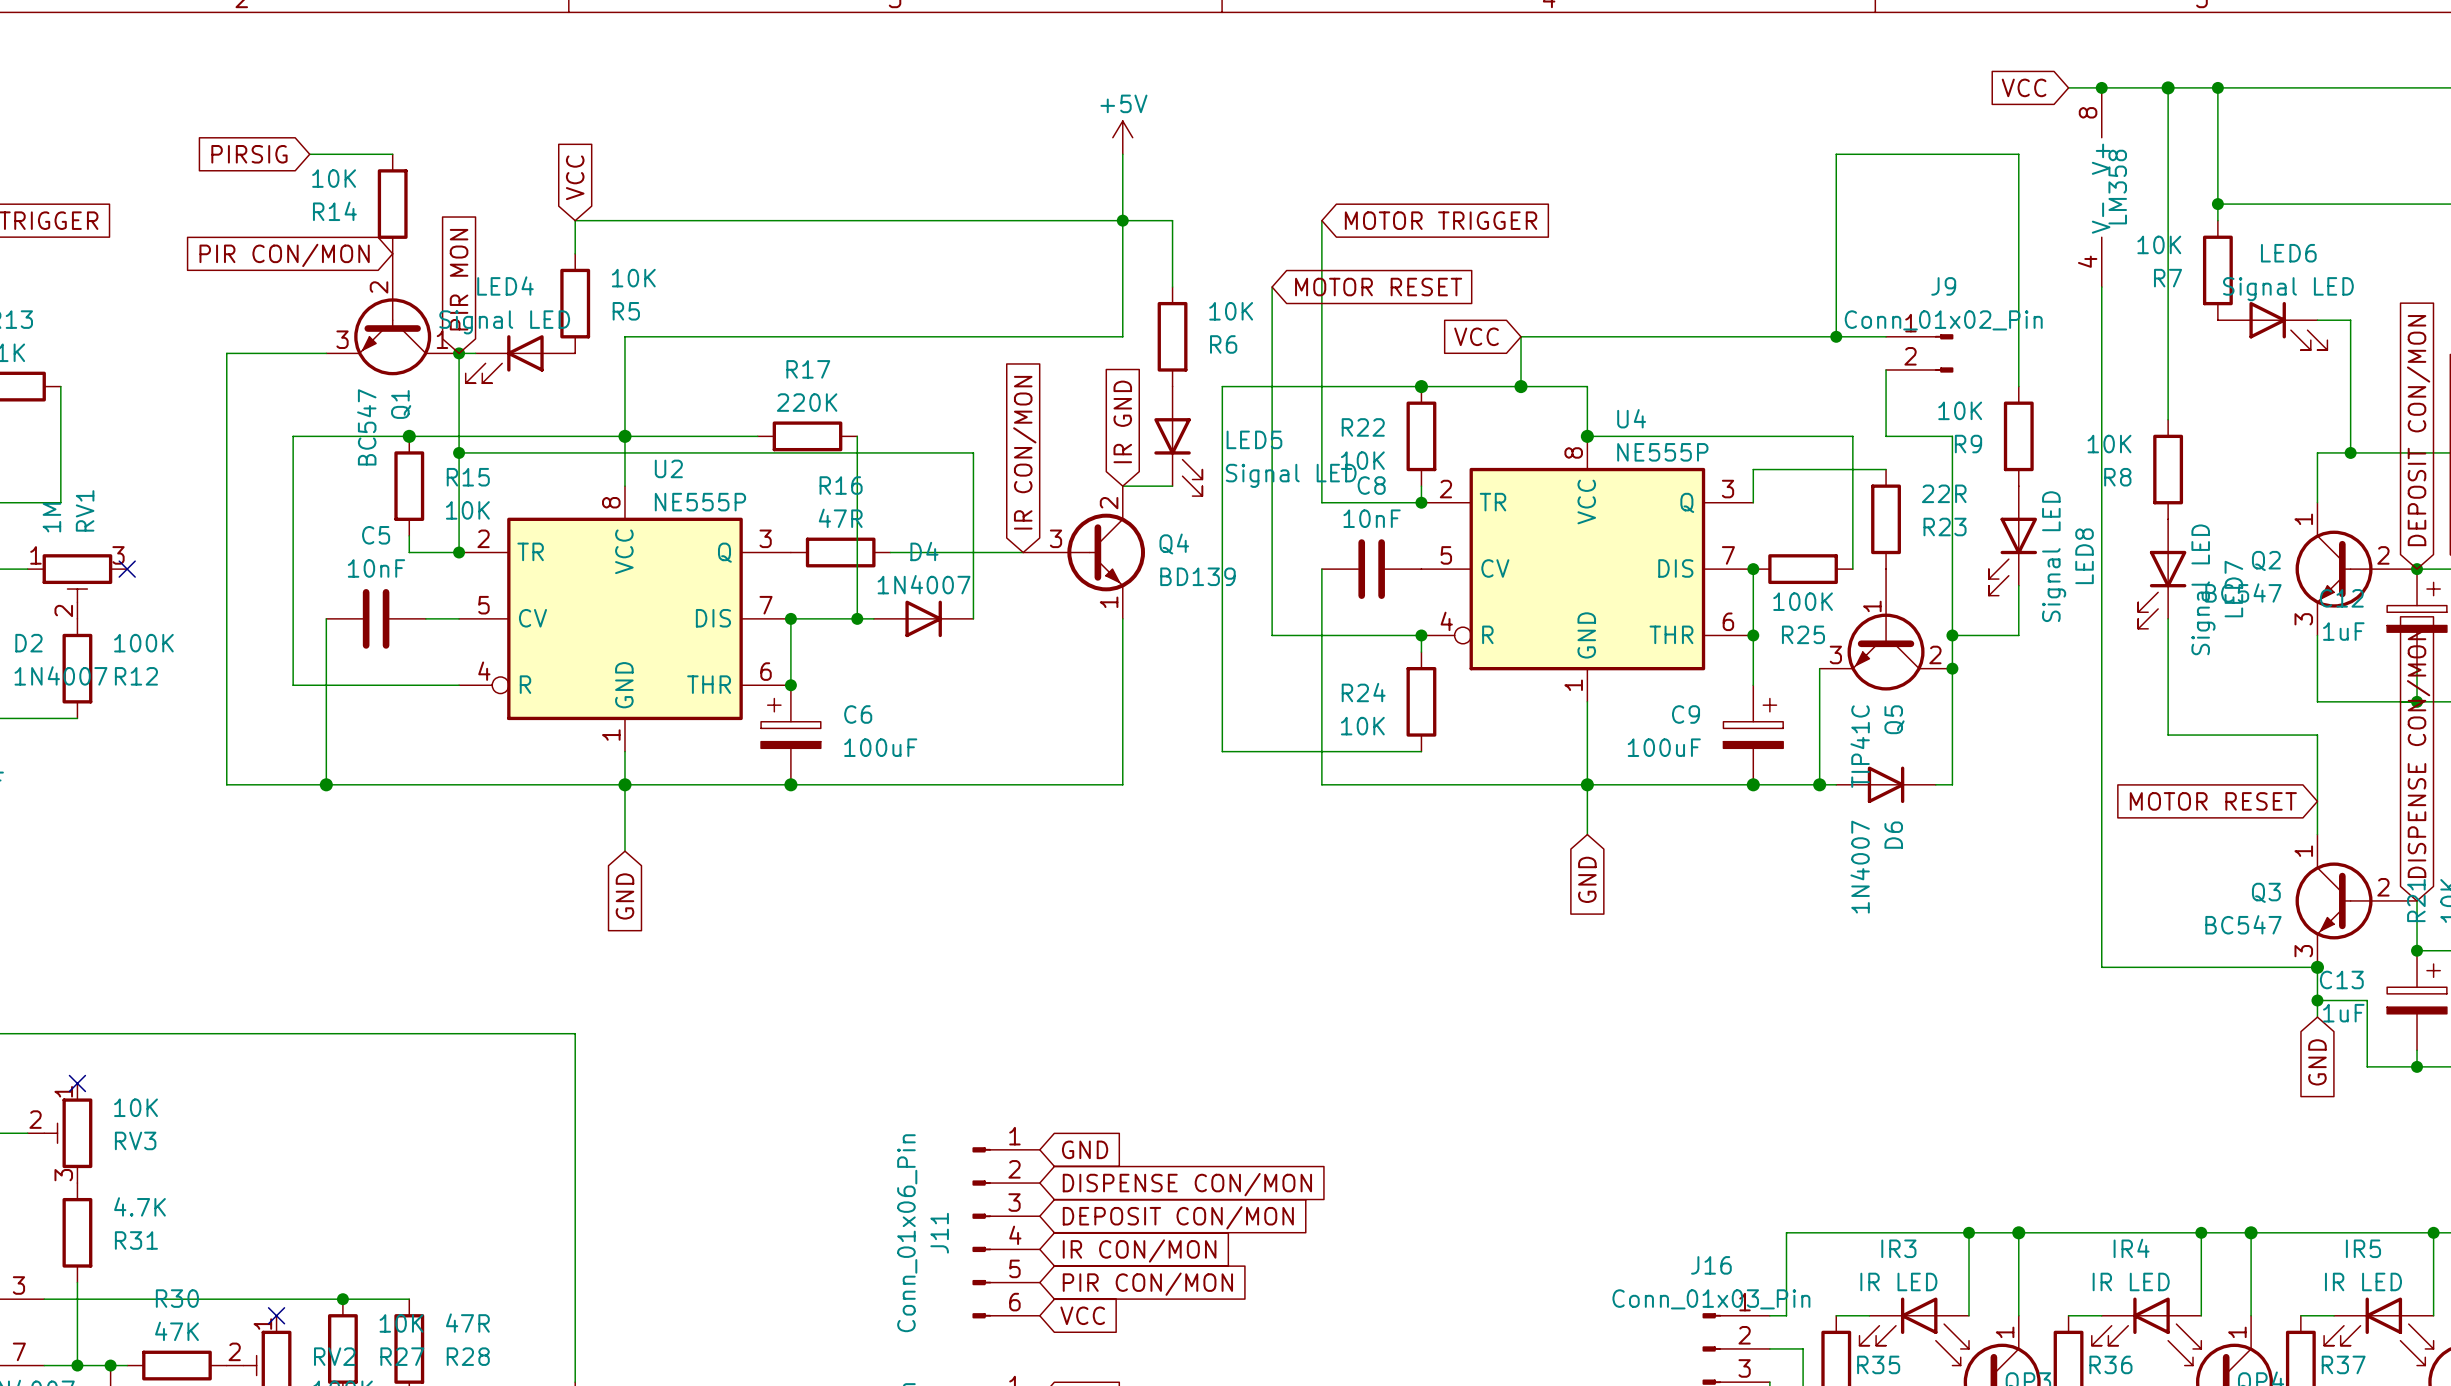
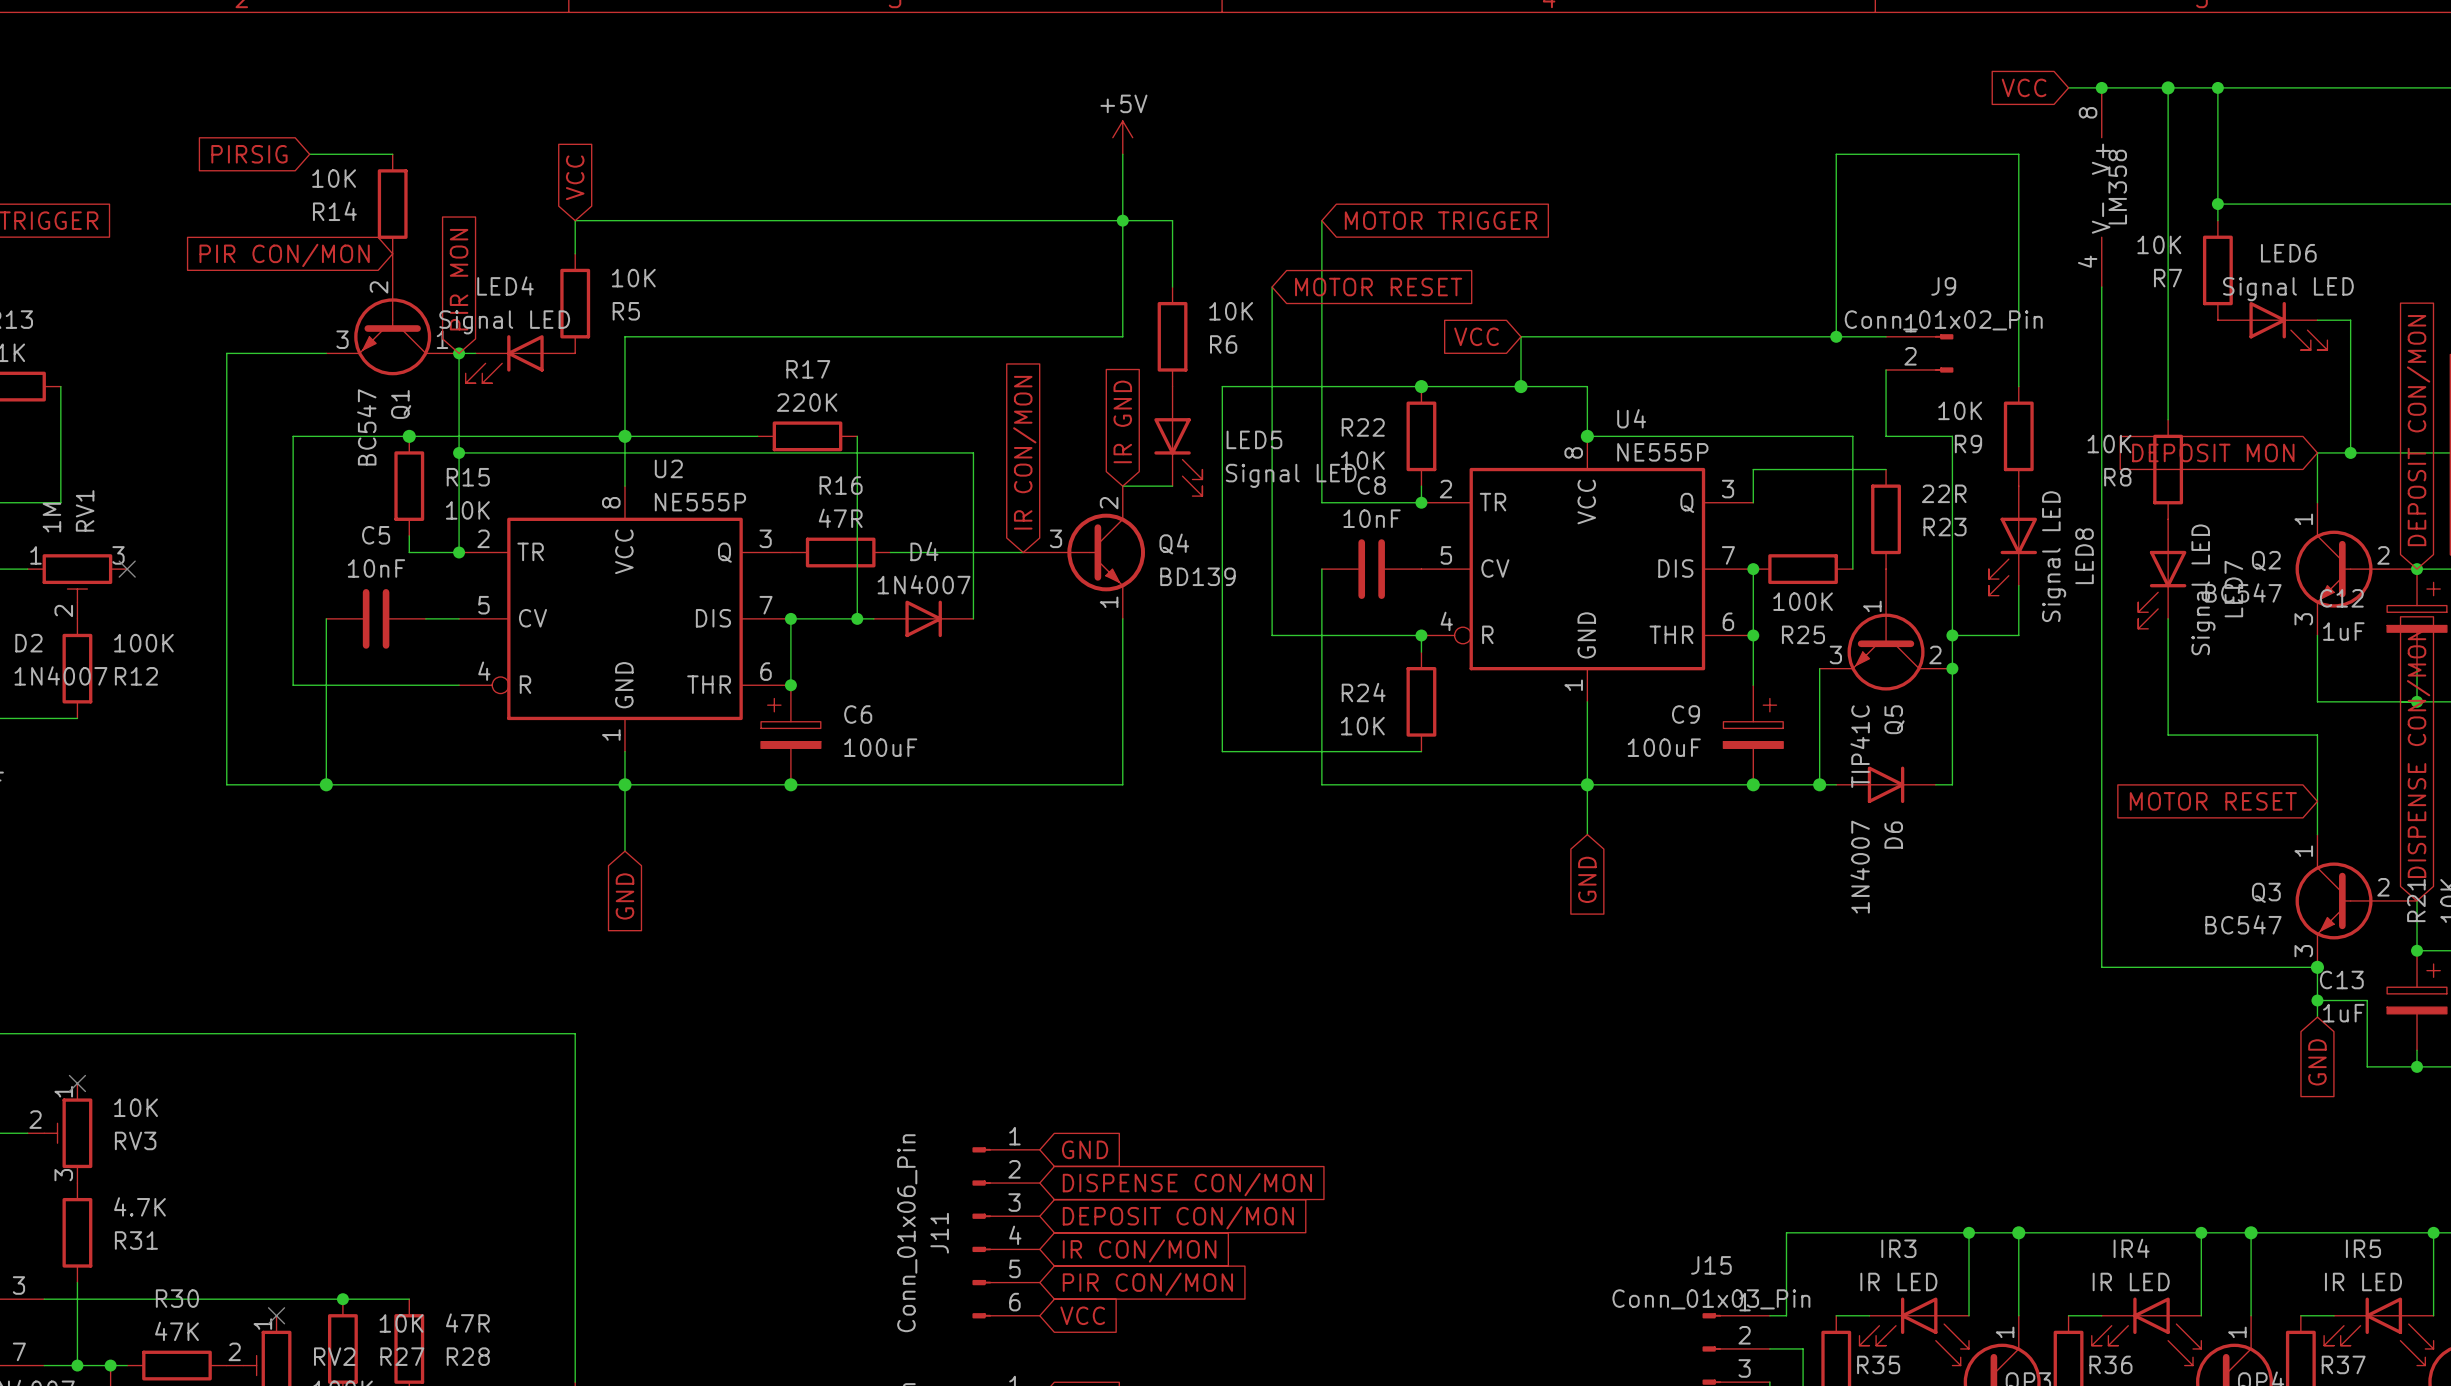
global label: none -> DEPOSIT MON (2213, 452)
J16 name: J16 (1711, 1265) -> J15 (1711, 1265)

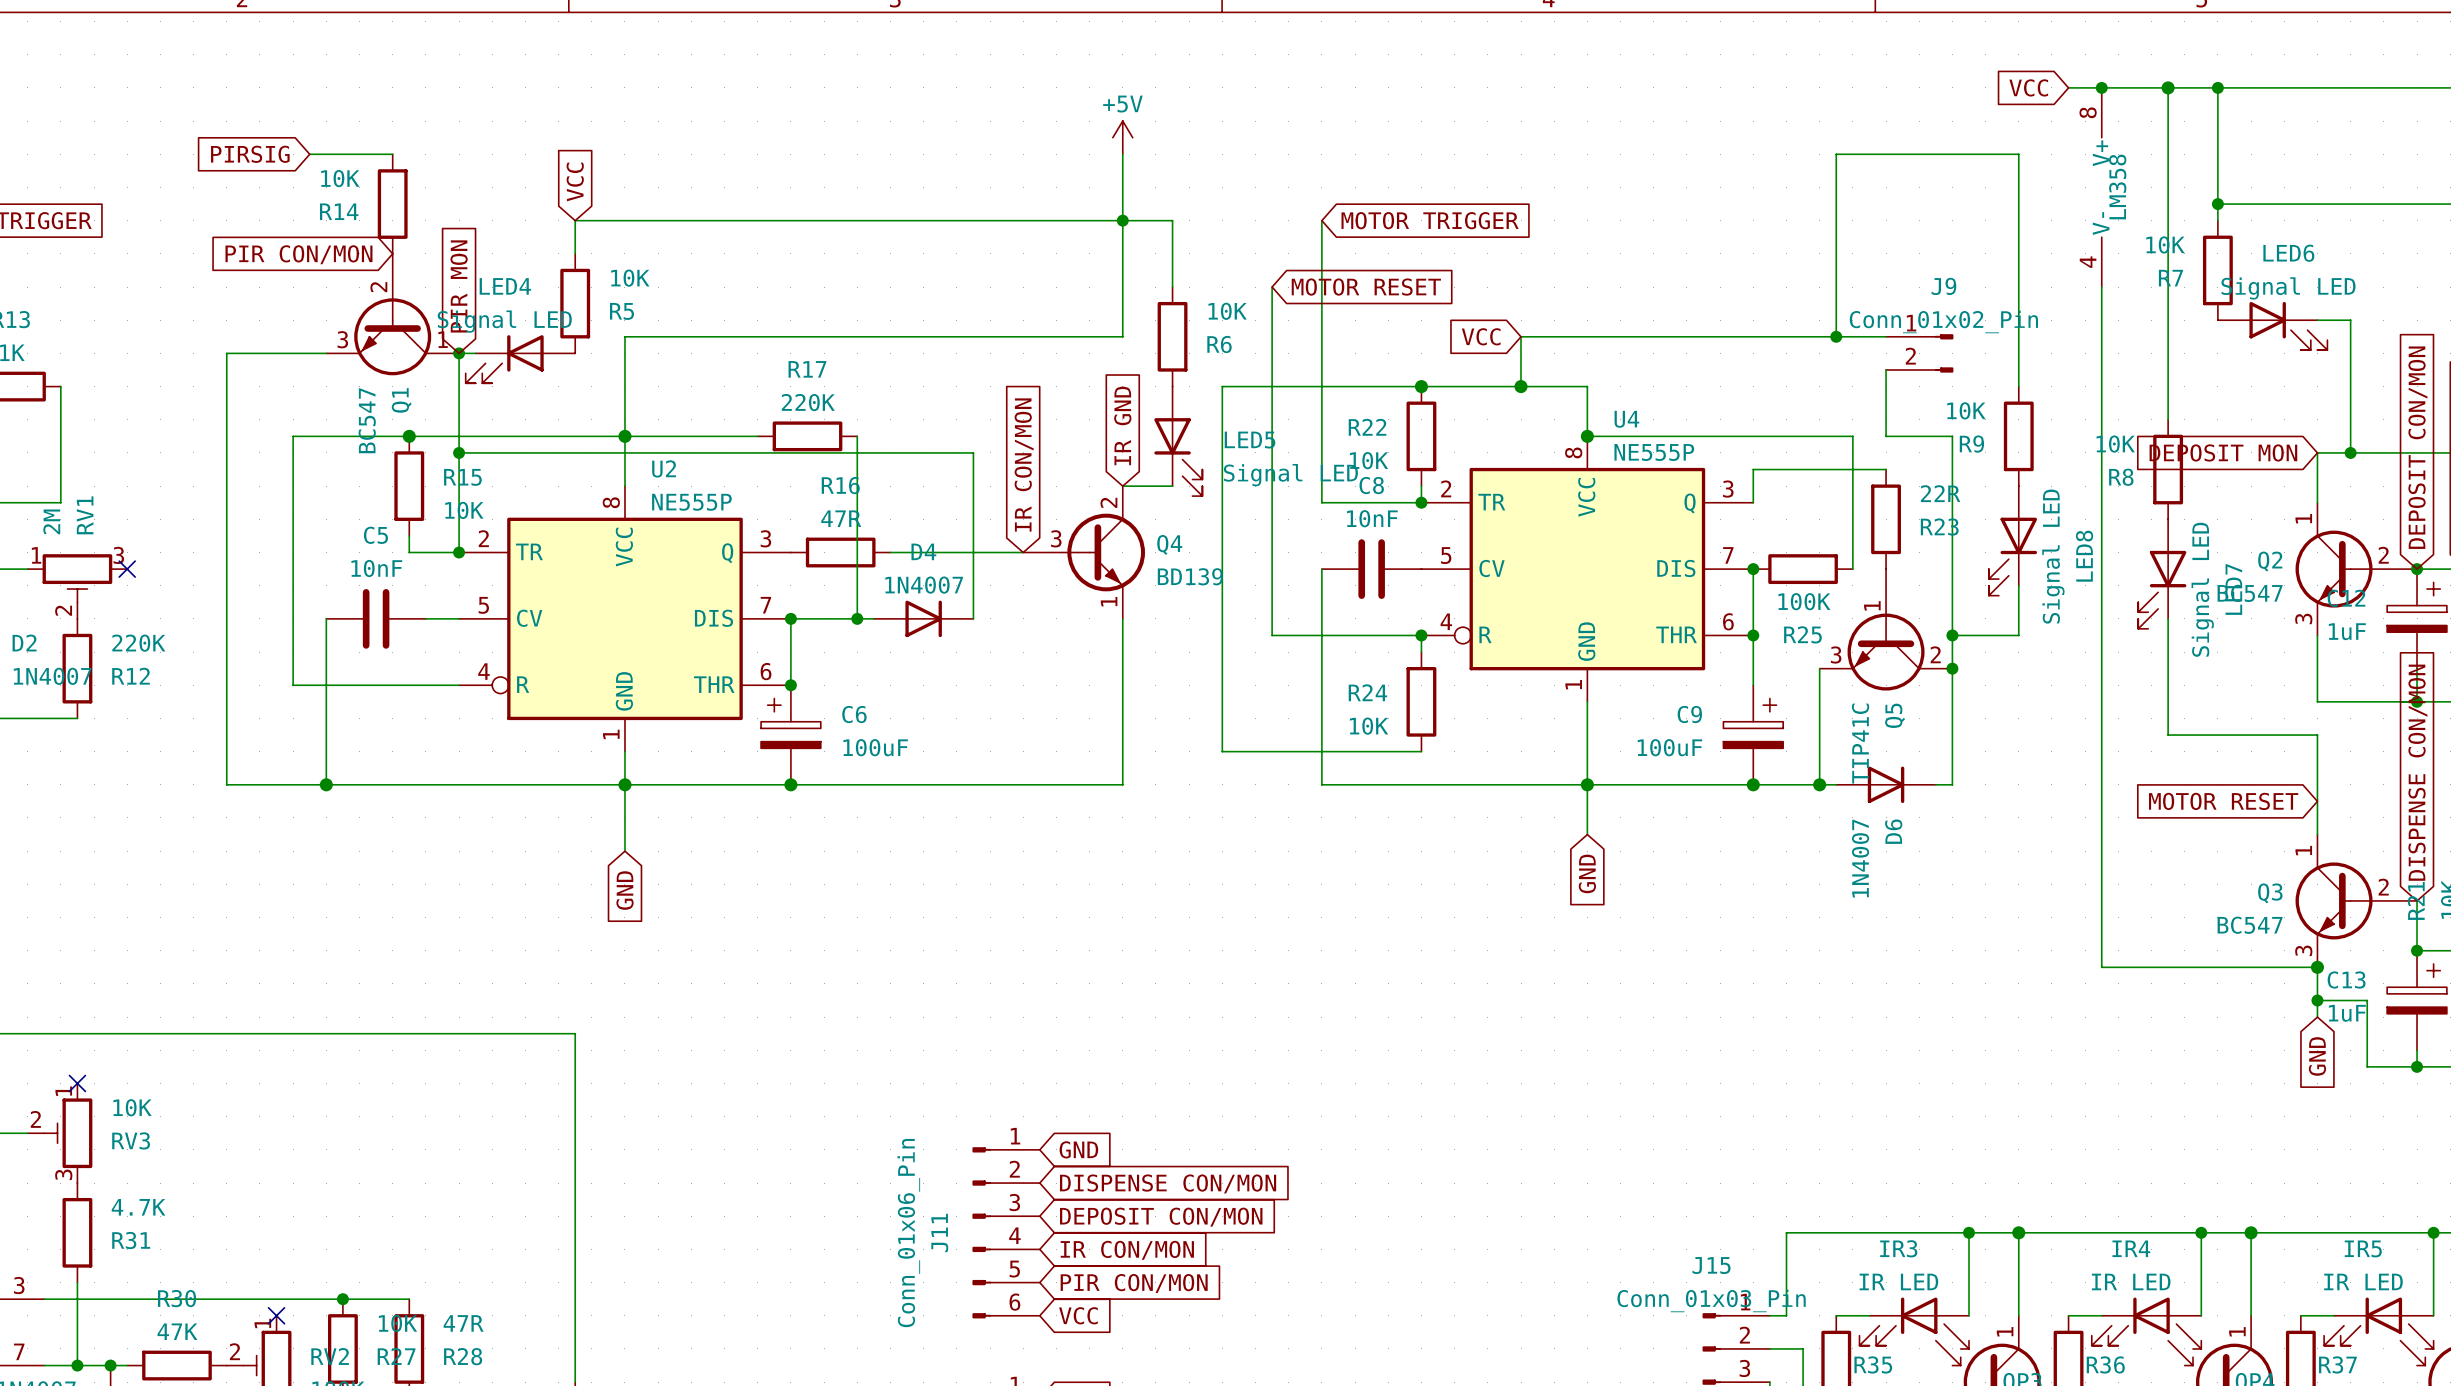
RV1 value: 1M (51, 517) -> 2M (51, 521)
R12 value: 100K (143, 643) -> 220K (138, 643)

